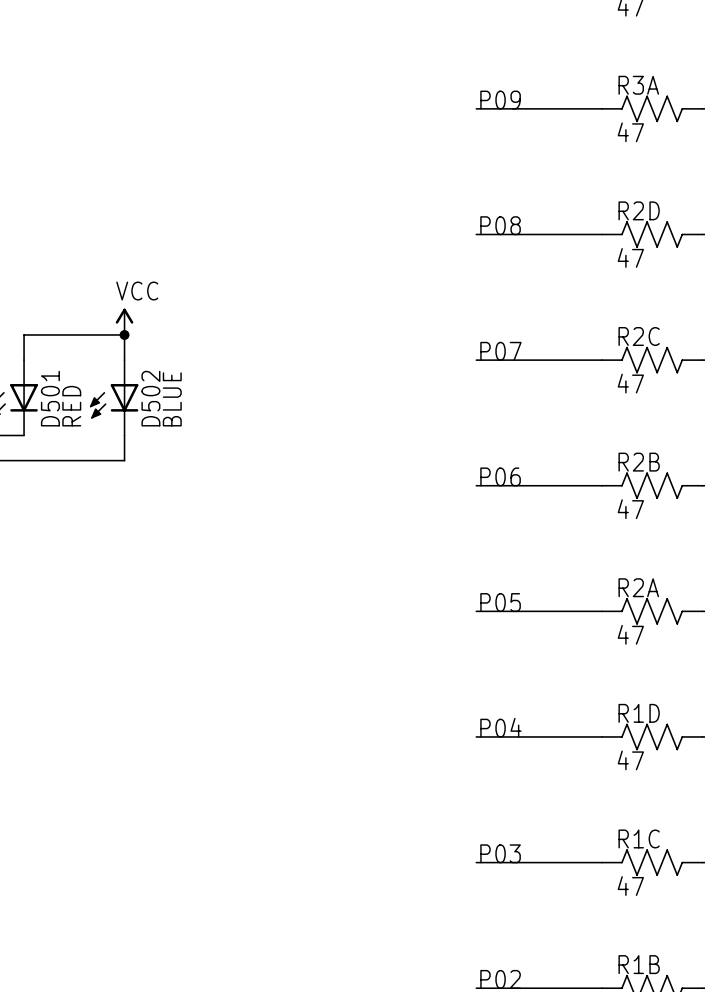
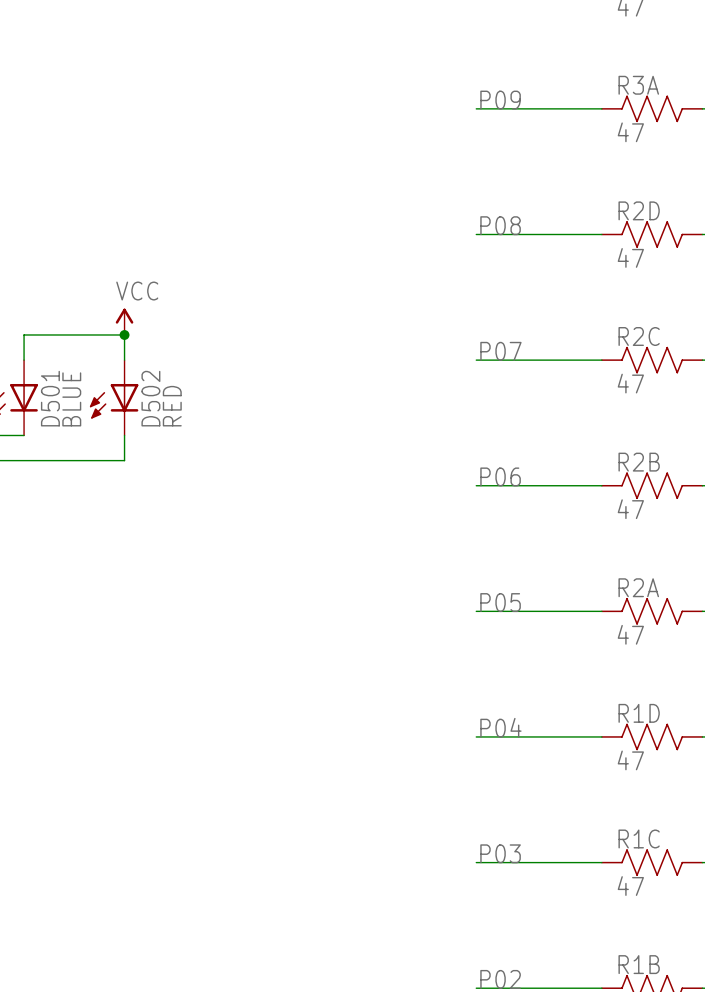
D502 value: BLUE (172, 399) -> RED (172, 406)
D501 value: RED (71, 406) -> BLUE (71, 399)

